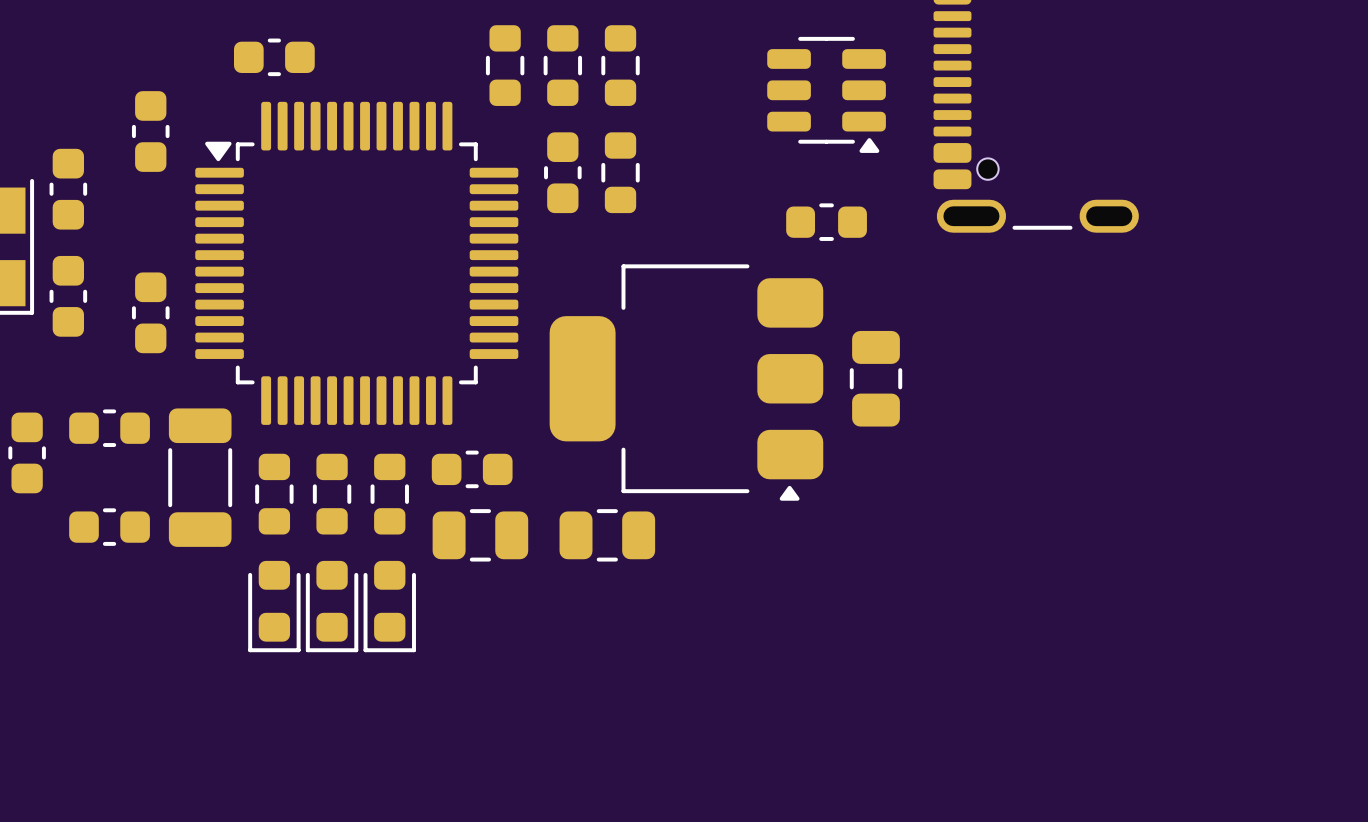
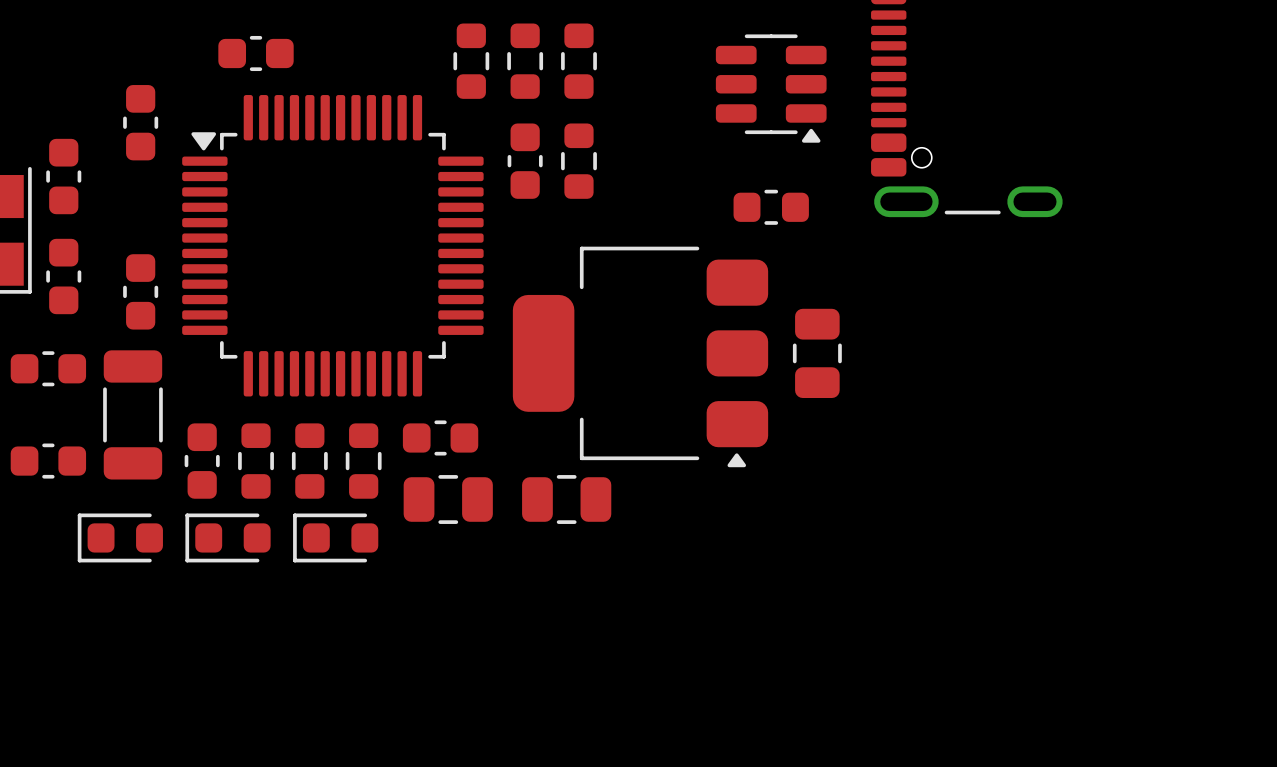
part: none -> (48, 368)
part footprint: [168, 408, 233, 547] -> [184, 423, 220, 499]
part: (109, 428) -> none
part: none -> (132, 414)
part: (27, 452) -> none
part: none -> (48, 461)
part: (109, 527) -> none
part: none -> (120, 537)
part: none -> (335, 537)
part rotation: 0° (274, 606) -> 90° clockwise (228, 537)
part: (332, 606) -> none
part: (389, 606) -> none

